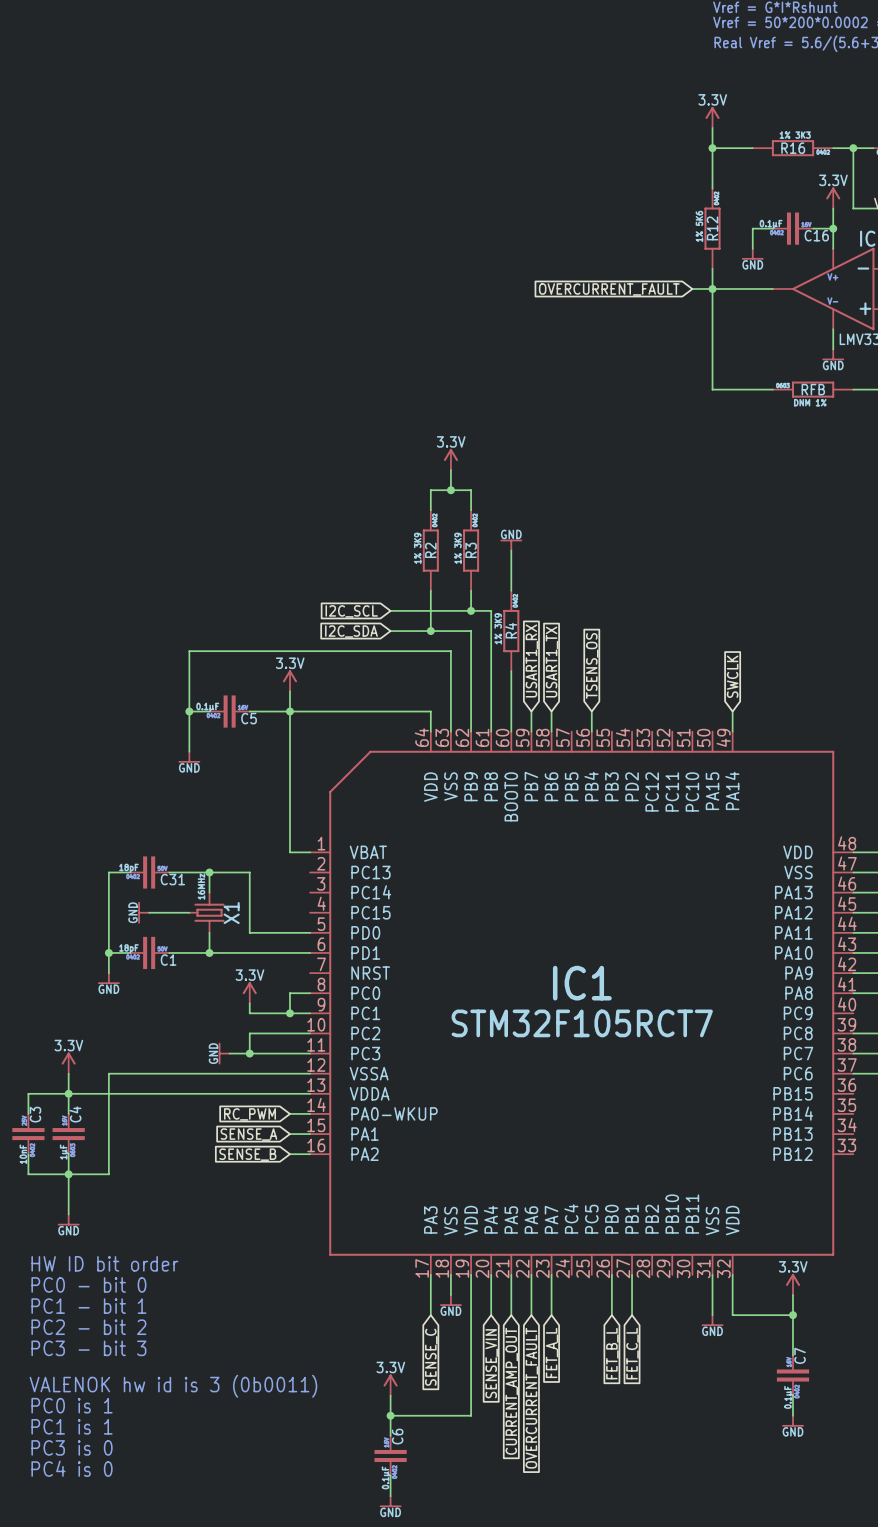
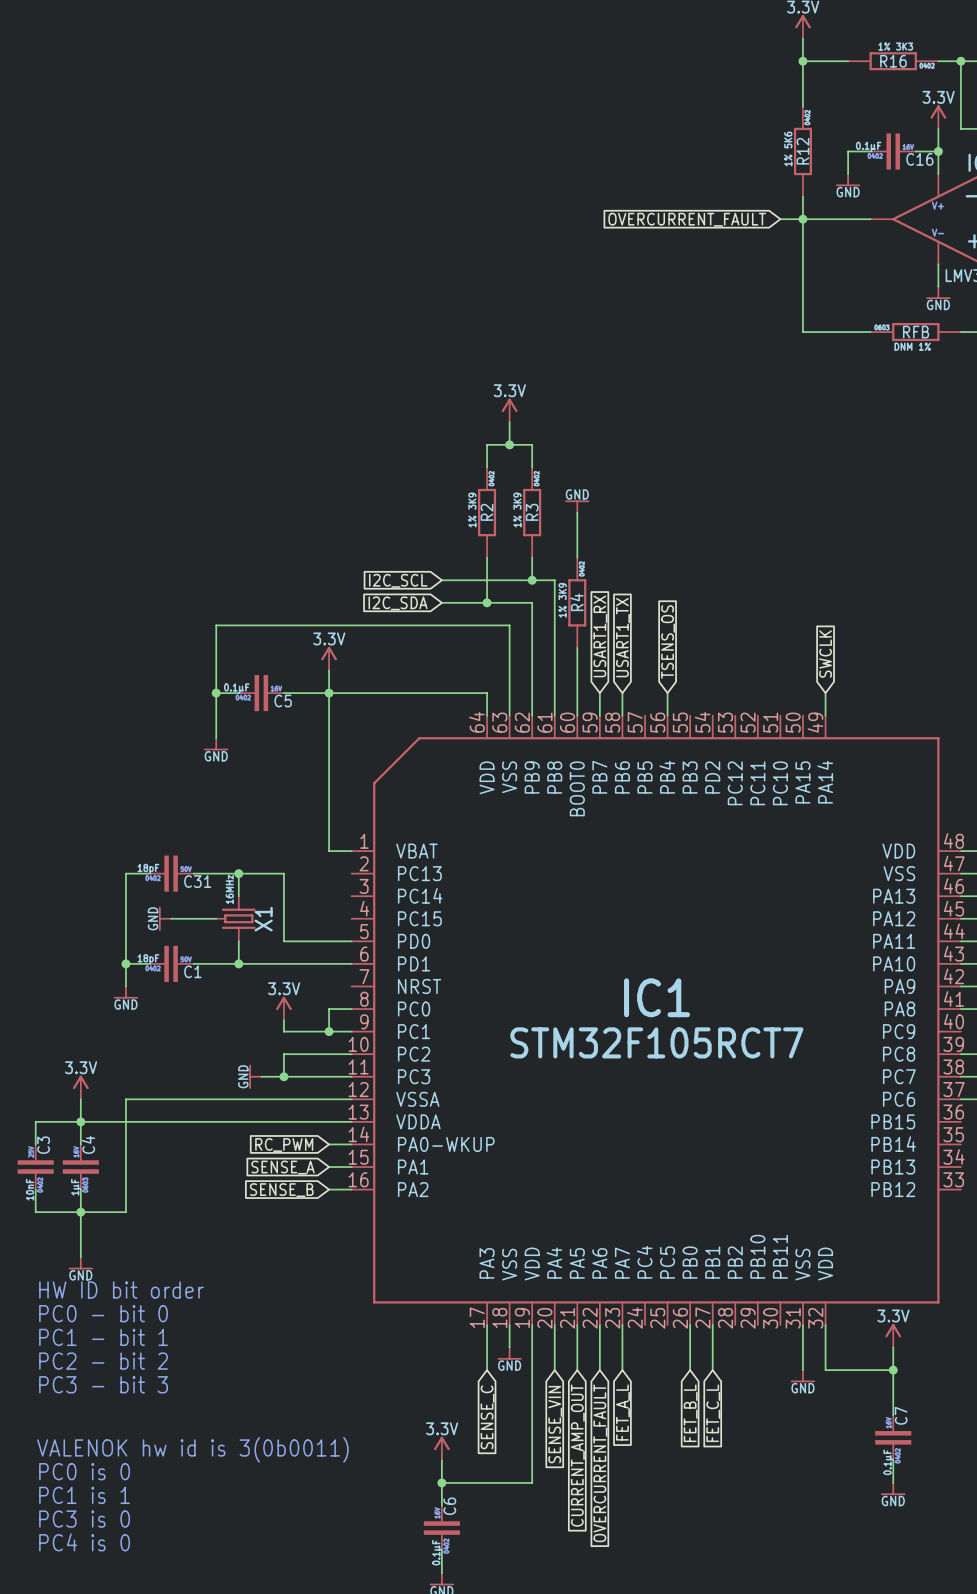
text: none -> HW ID bit order (121, 1290)
text: HW ID bit order (104, 1263) -> PC0 - bit 0 (103, 1313)
text: PC0 - bit 0 (88, 1284) -> PC1 - bit 1 (103, 1337)
text: PC1 - bit 1 (88, 1306) -> PC2 - bit 2 (103, 1361)
text: PC2 - bit 2 (88, 1327) -> PC3 - bit 3 (103, 1384)
text: PC3 - bit 3 (88, 1348) -> none
text: VALENOK hw id is 3 (0b0011) (173, 1386) -> VALENOK hw id is 3(0b0011) (192, 1449)
text: PC0 is 1 (72, 1405) -> PC0 is 0 (84, 1471)

